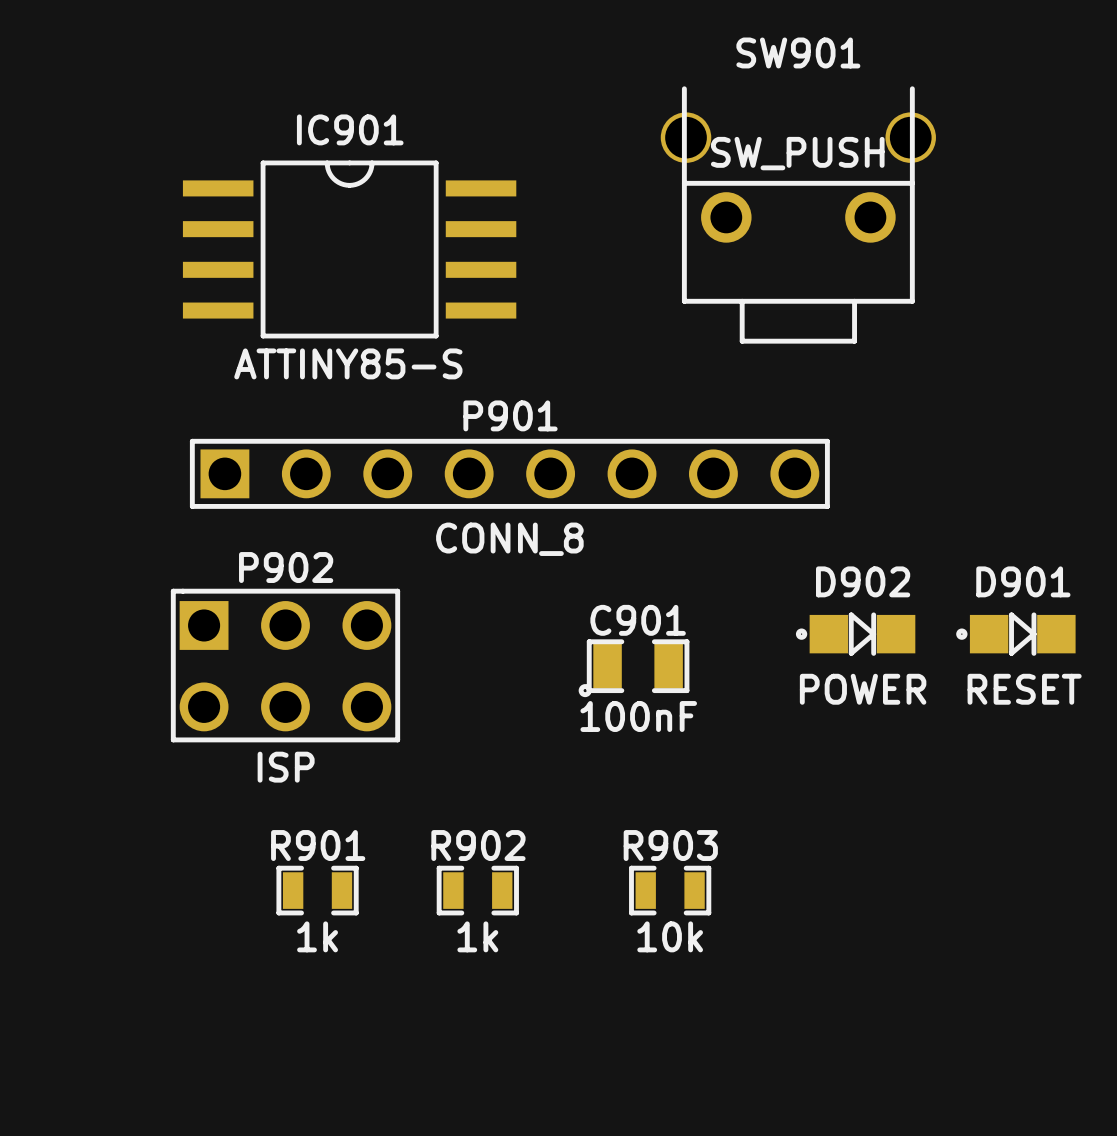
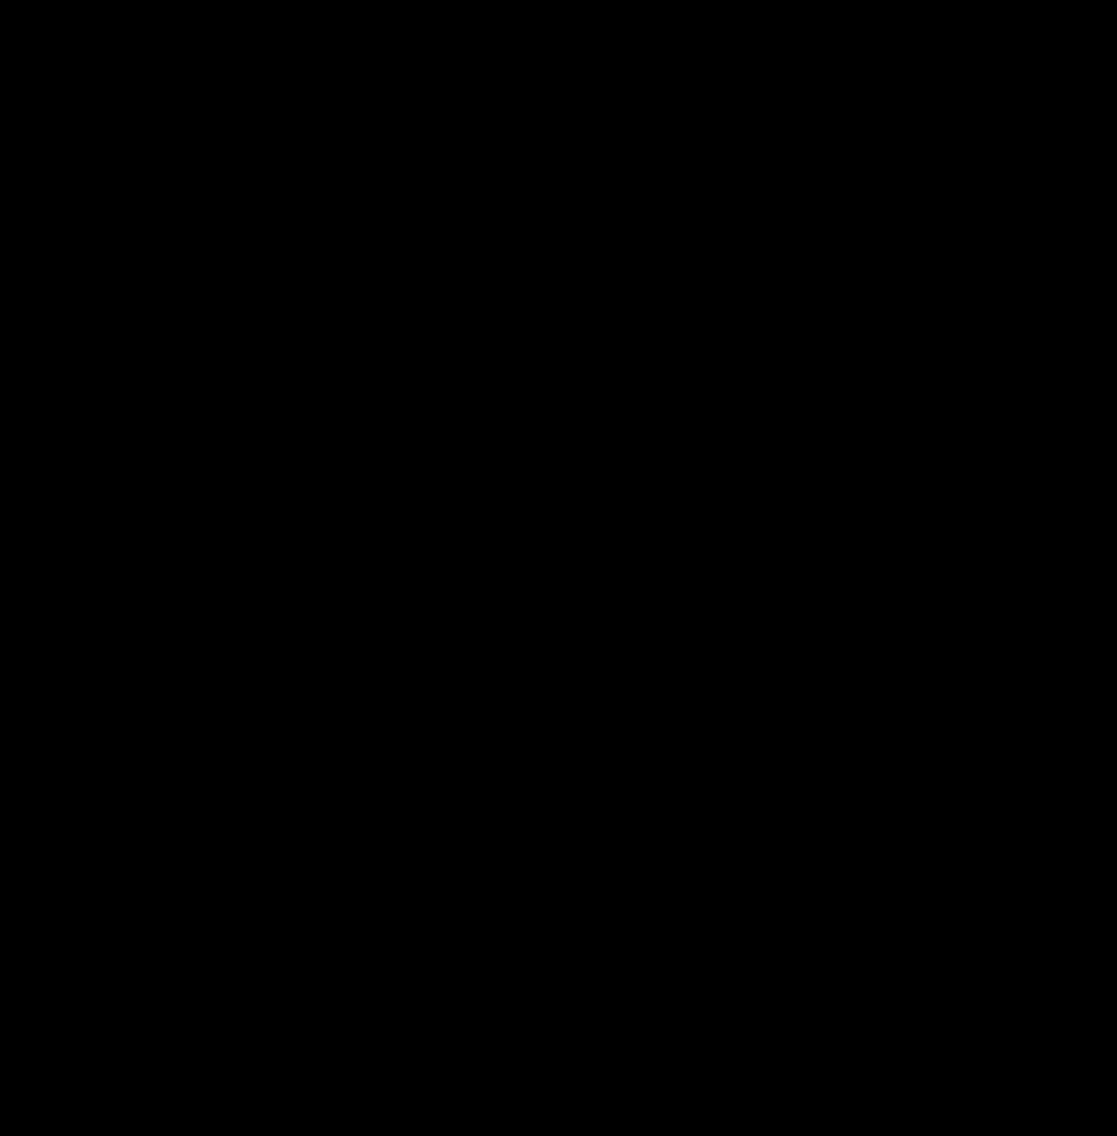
SW901: SW_PUSH (798, 214) -> none
IC901: ATTINY85-S (349, 249) -> none
P901: CONN_8 (509, 473) -> none
D902: POWER (855, 634) -> none
D901: RESET (1015, 634) -> none
P902: ISP (285, 665) -> none
C901: 100nF (634, 668) -> none
R901: 1k (317, 890) -> none
R902: 1k (477, 890) -> none
R903: 10k (670, 890) -> none

